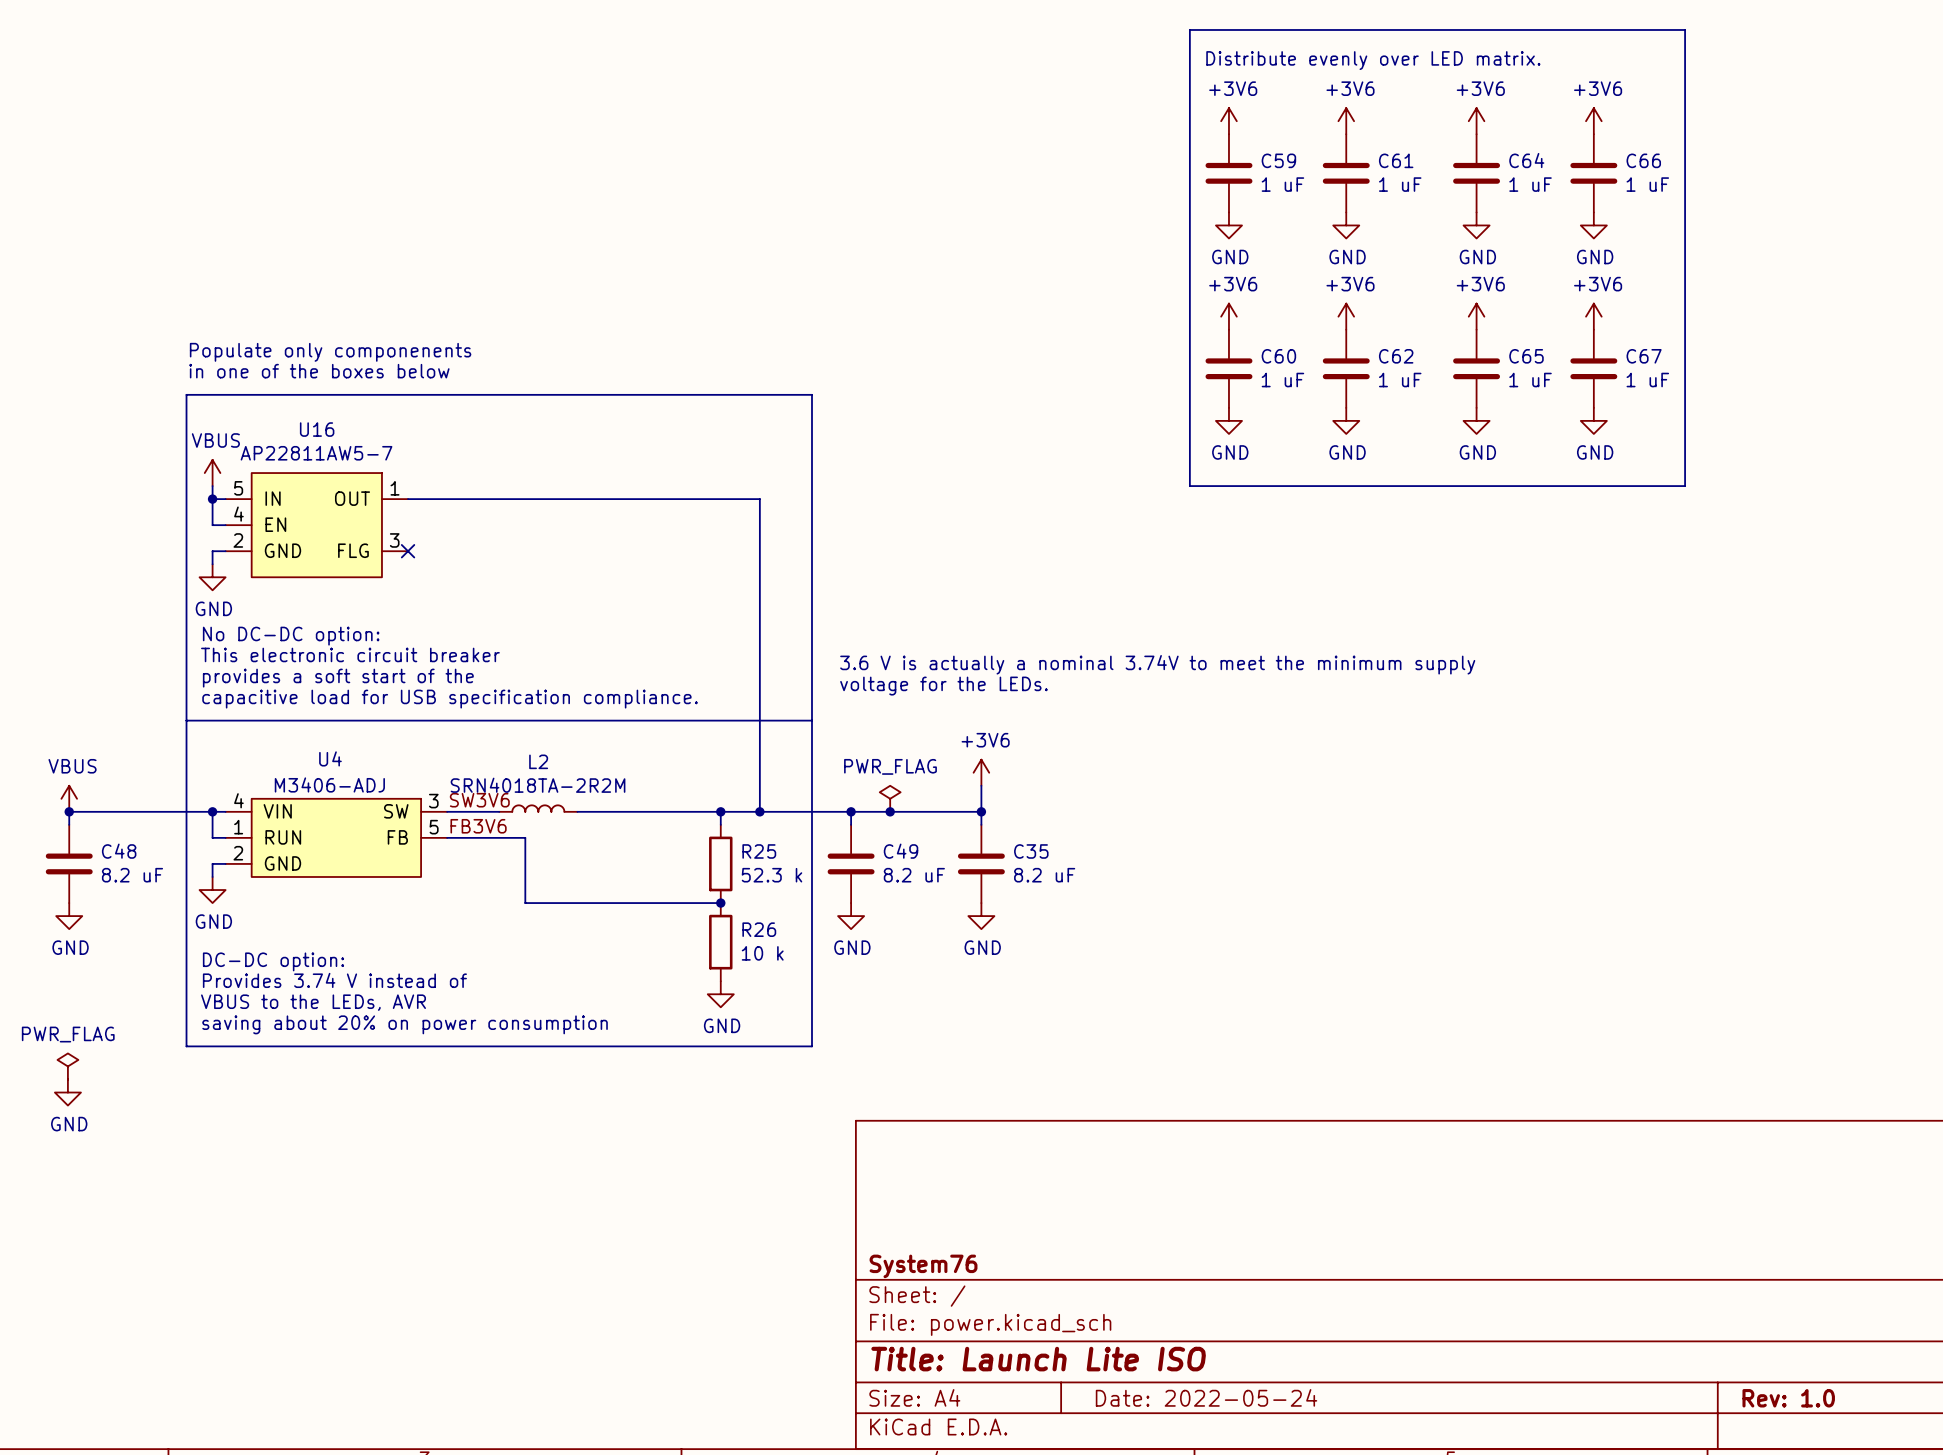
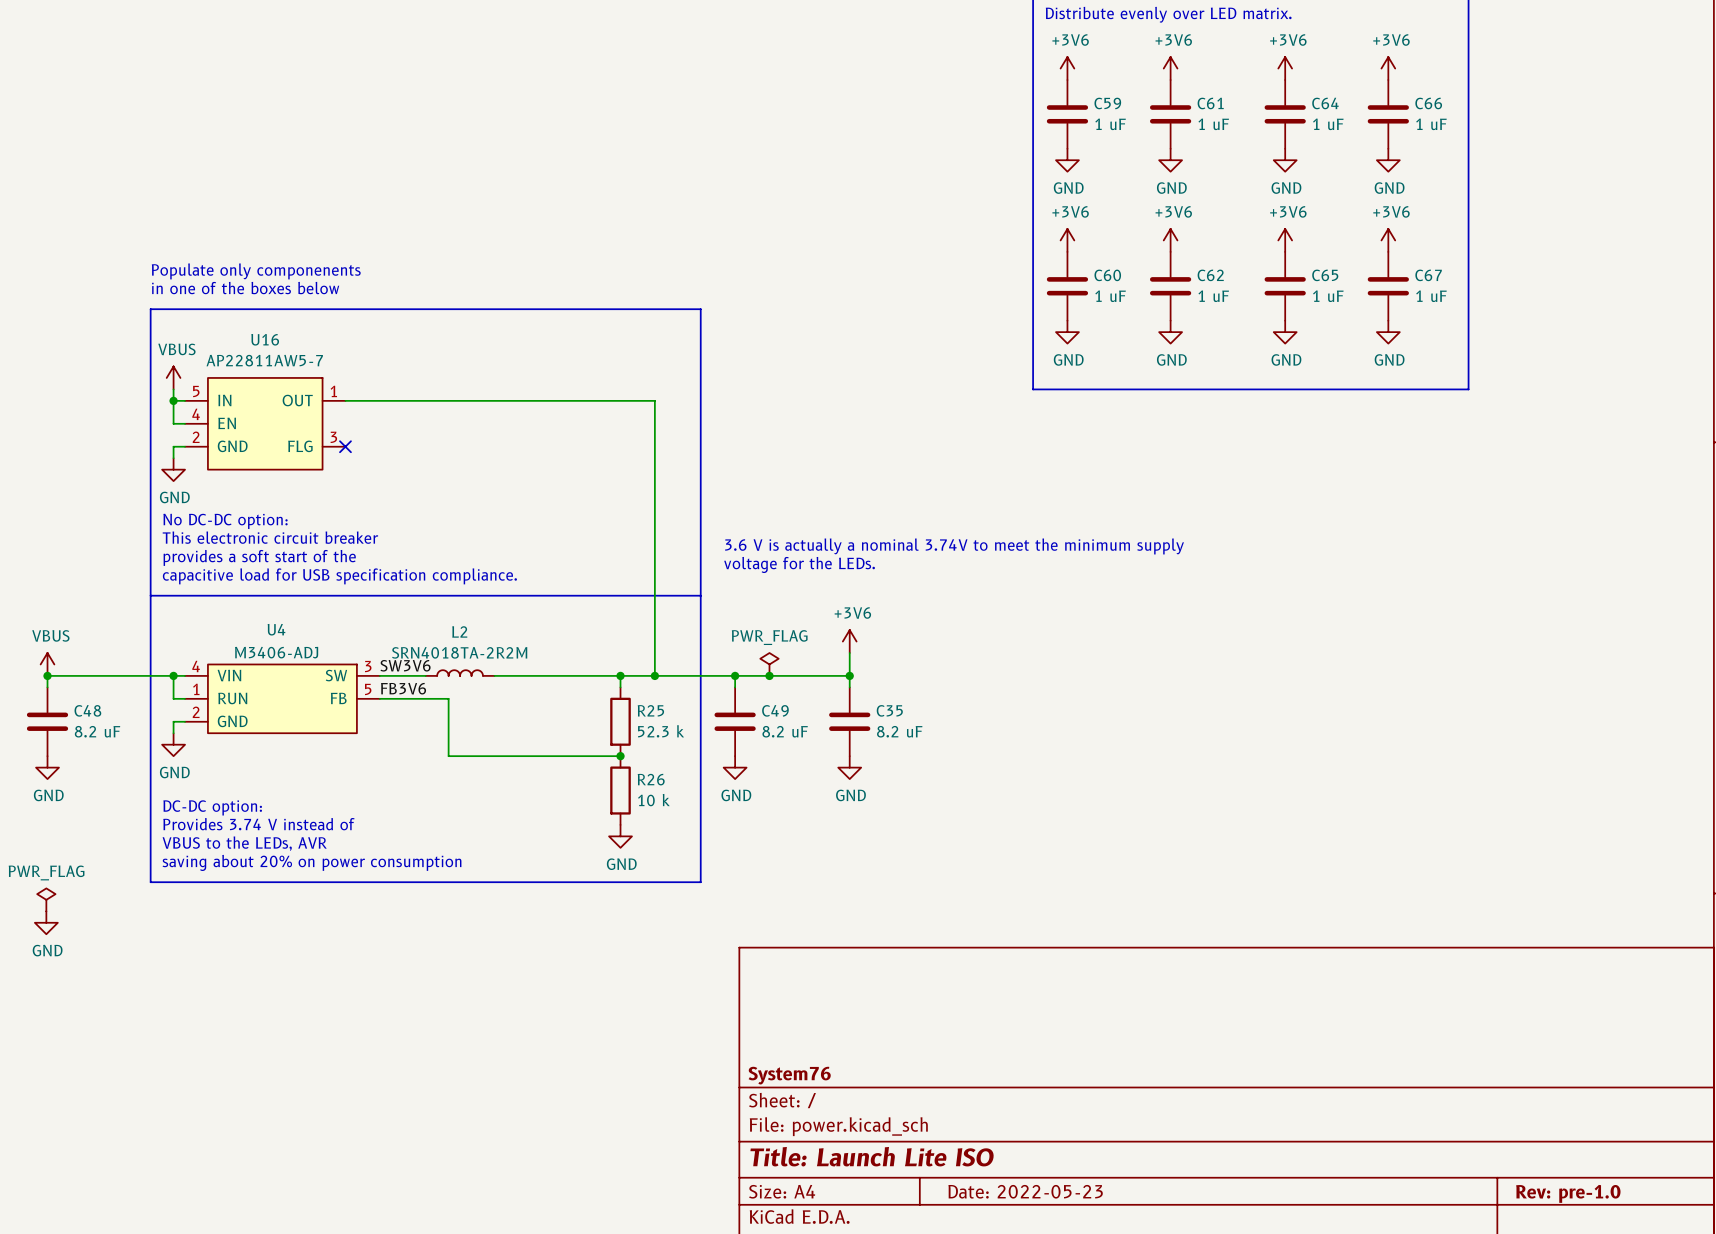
title block: Date: 2022-05-24 (1206, 1397) -> Date: 2022-05-23 (1025, 1191)
title block: Rev: 1.0 (1788, 1398) -> Rev: pre-1.0 (1568, 1193)

